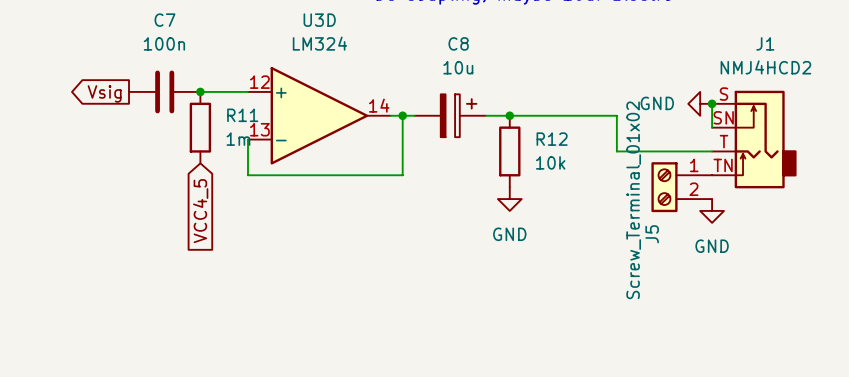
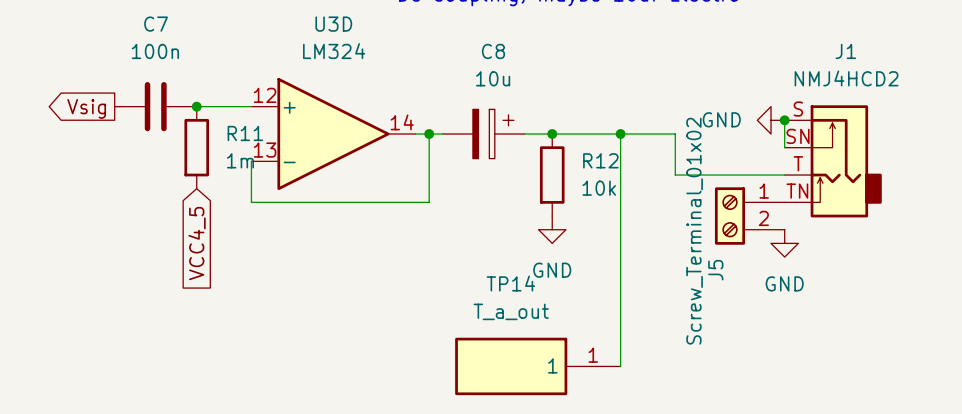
wire: none -> (620, 134) (620, 366)
junction: none -> (620, 134)
TP14: none -> T_a_out (537, 366)

